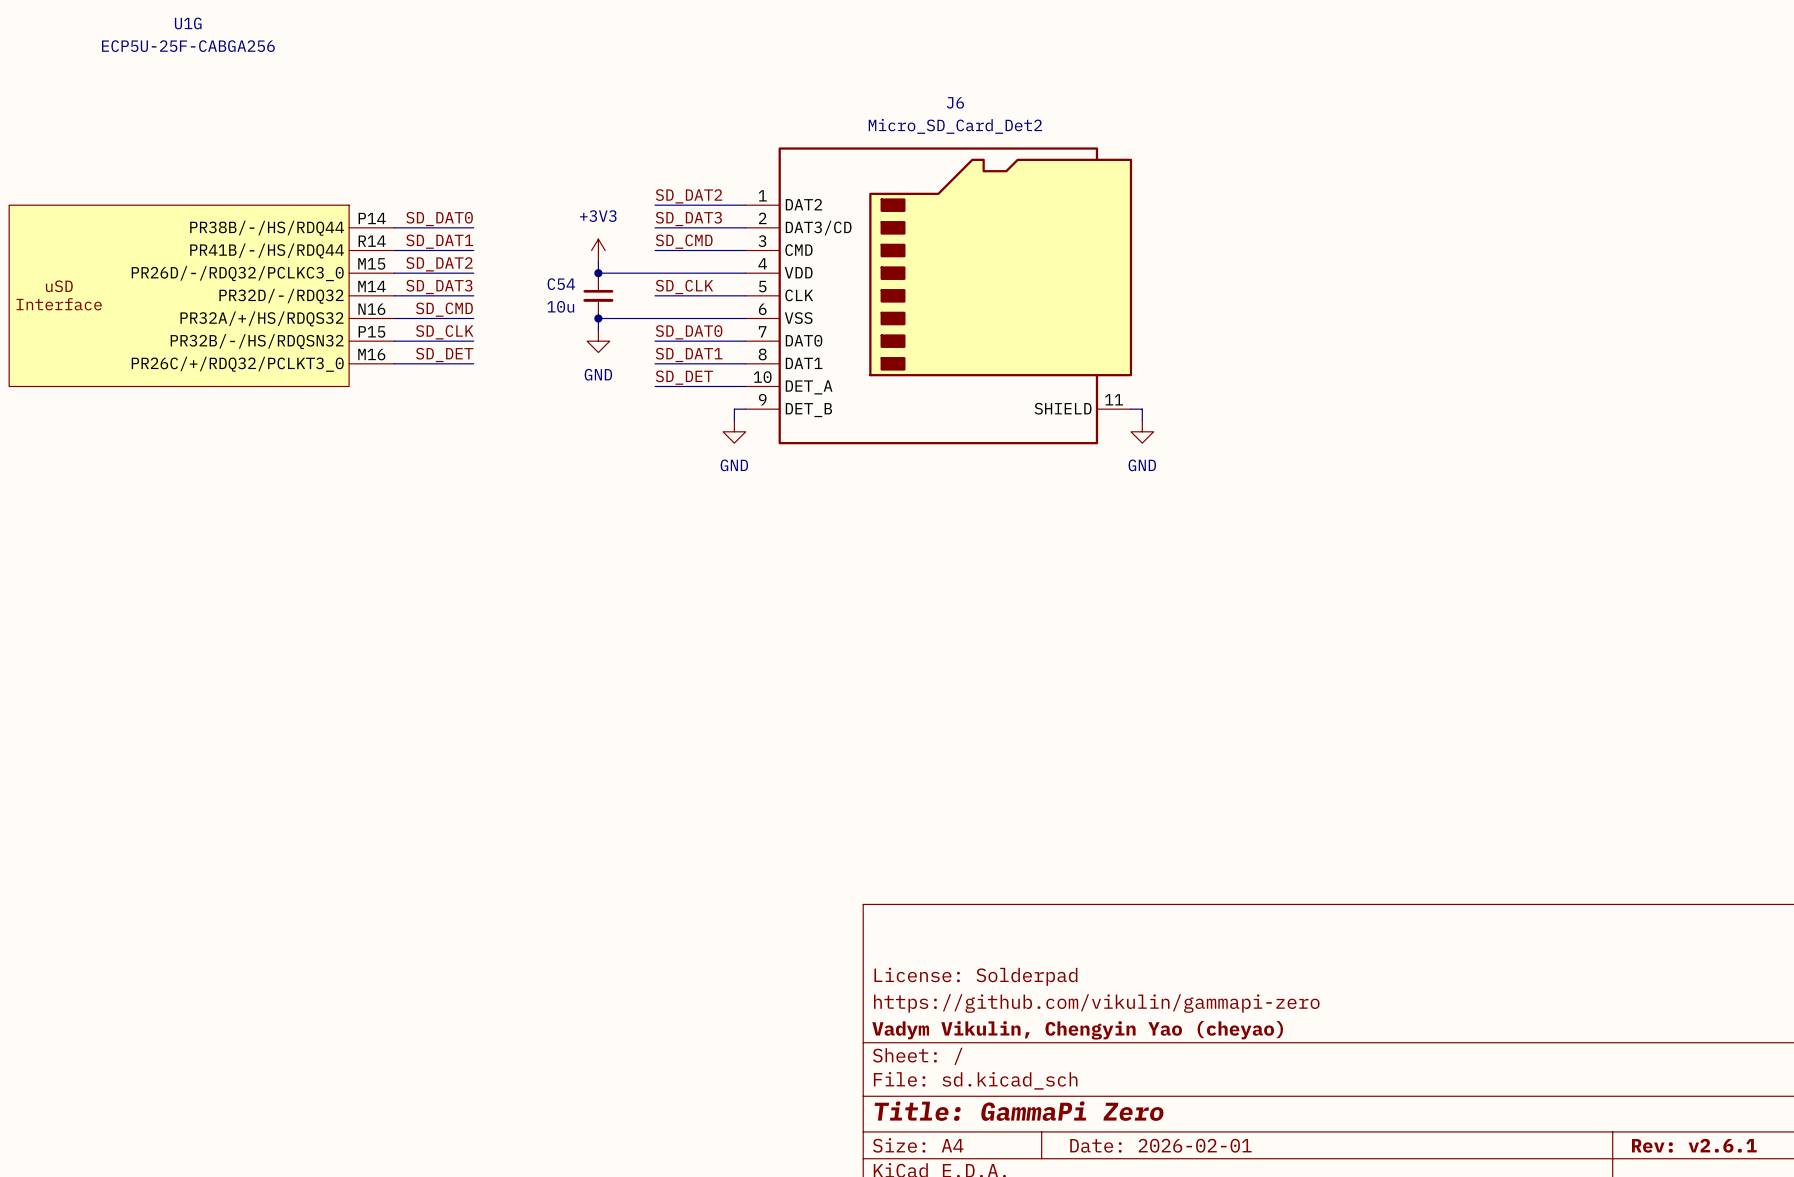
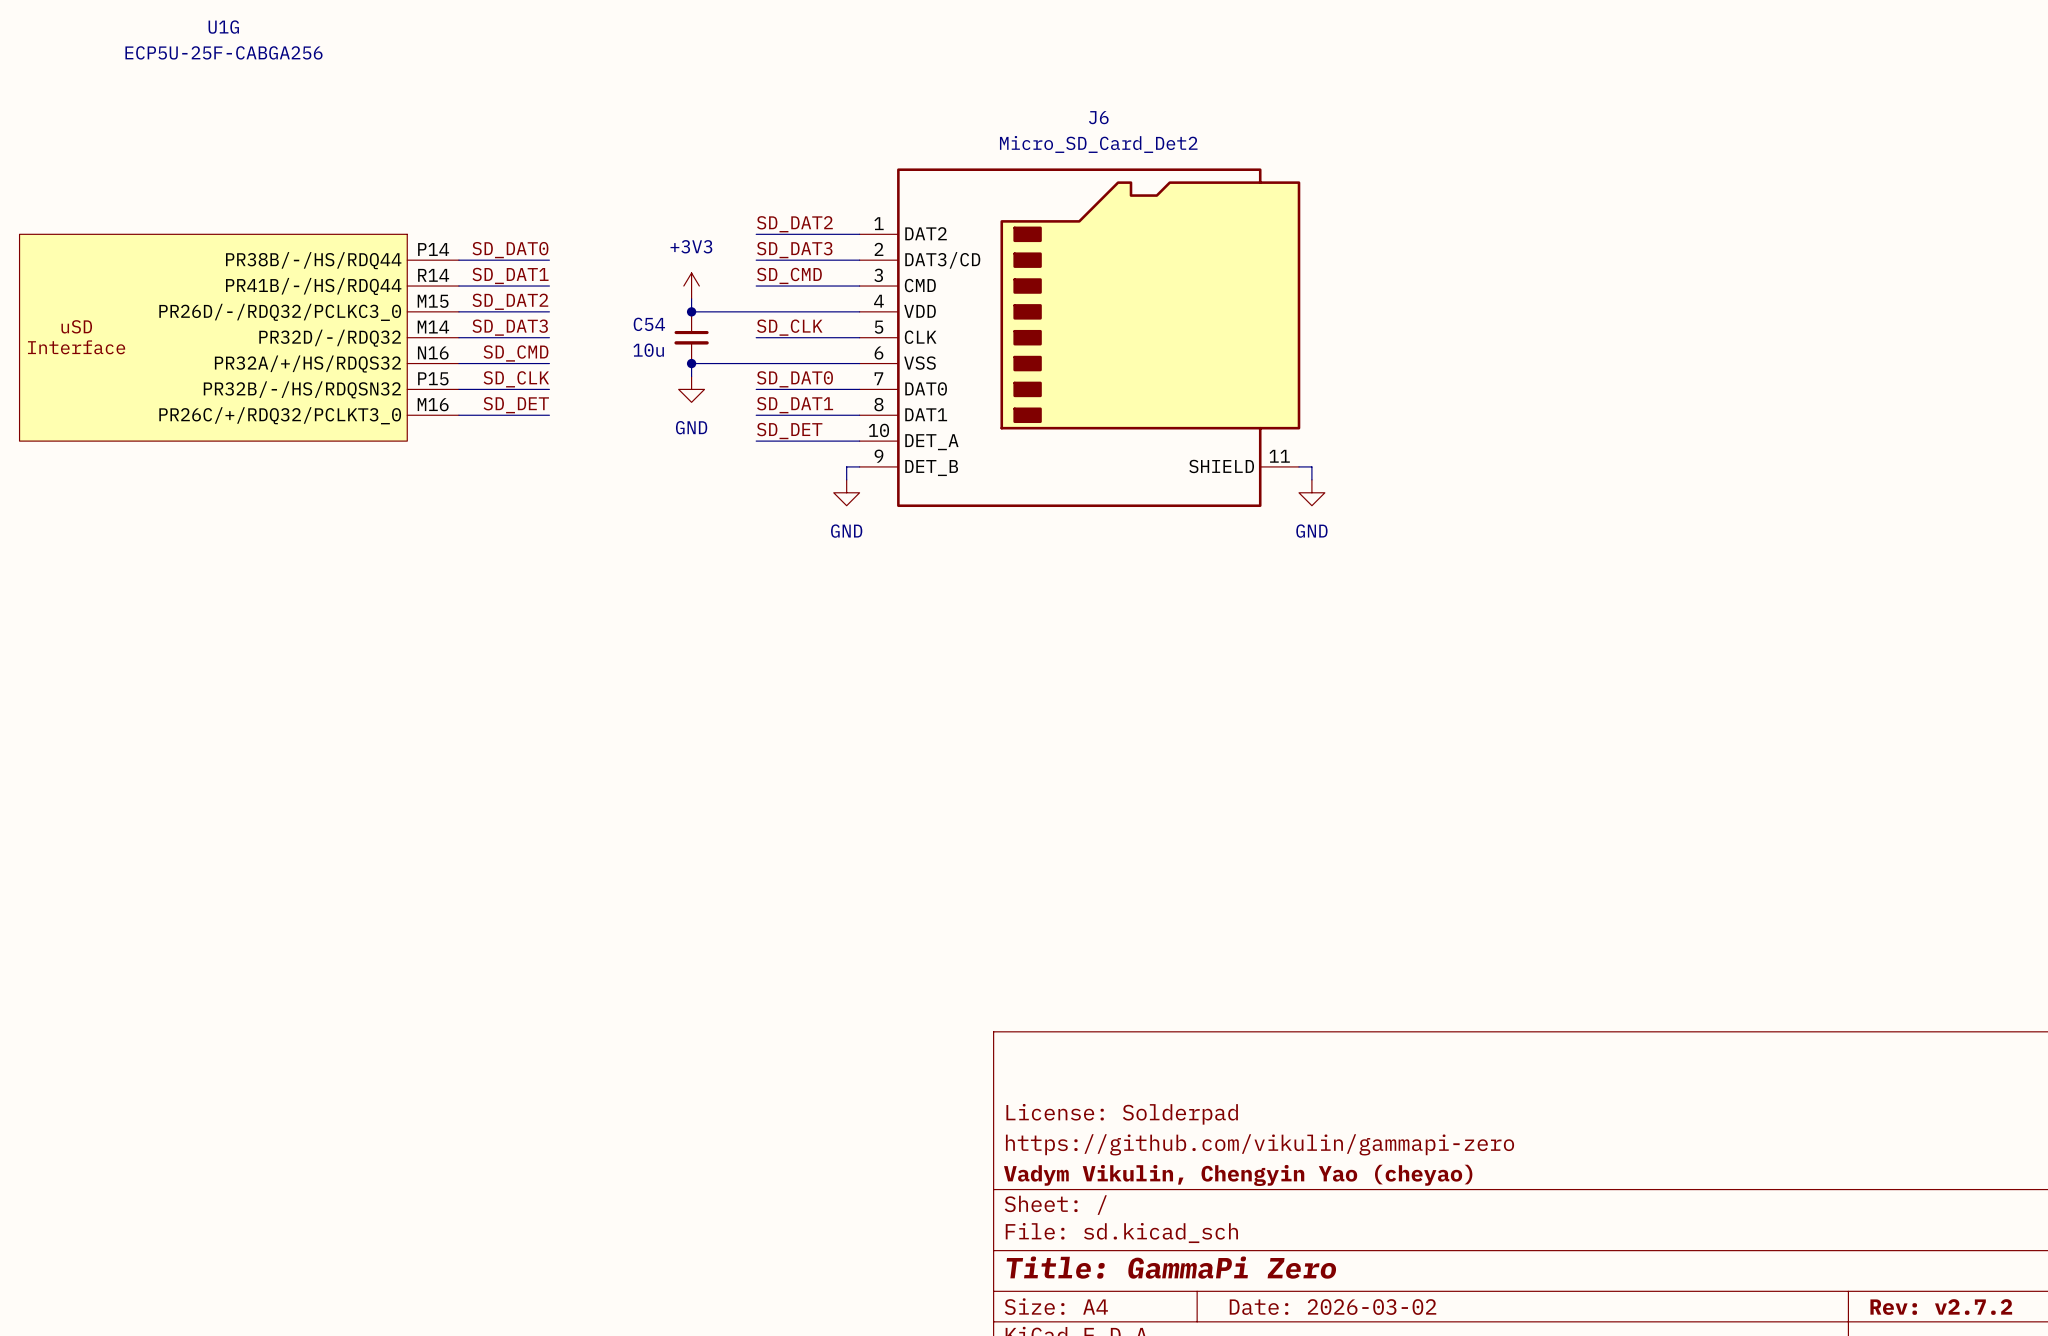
title block: Date: 2026-02-01 (1160, 1145) -> Date: 2026-03-02 (1332, 1307)
title block: Rev: v2.6.1 (1694, 1145) -> Rev: v2.7.2 (1941, 1307)

